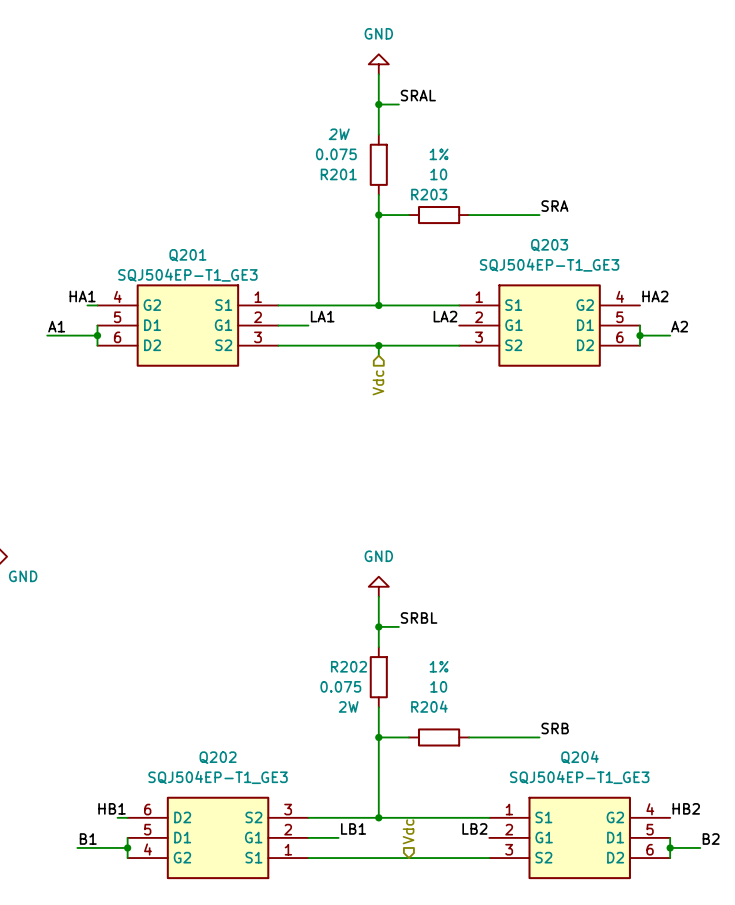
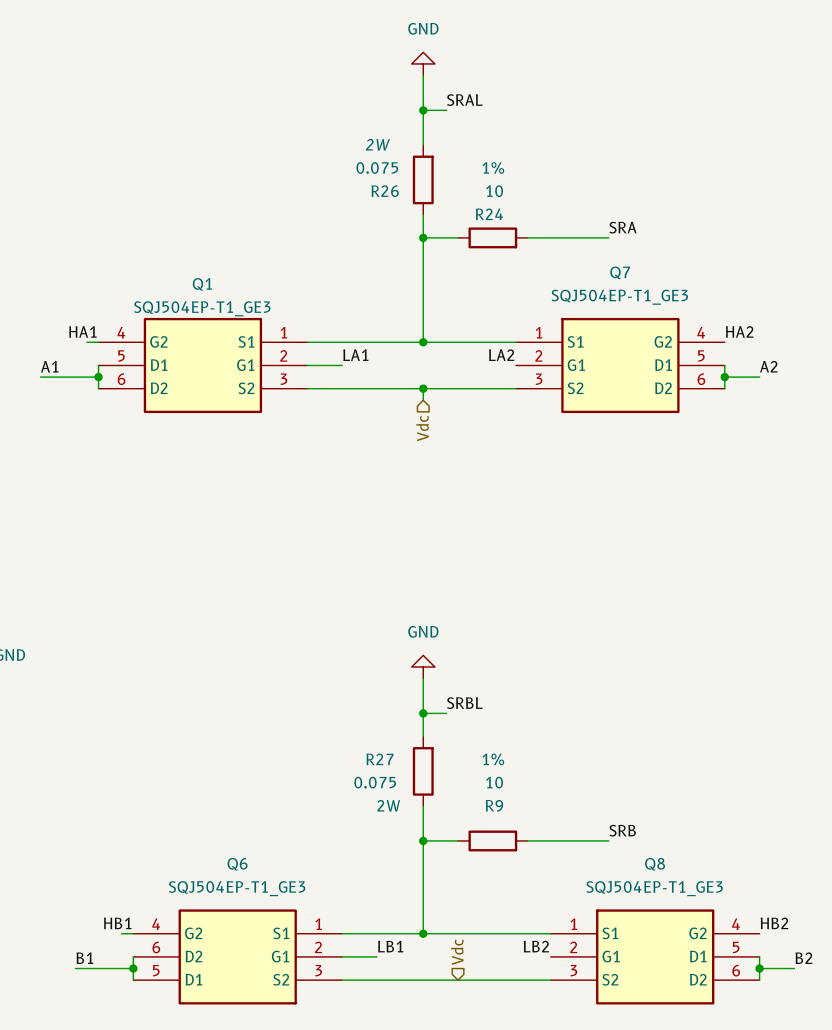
R201 name: R201 (338, 174) -> R26 (385, 191)
R203 name: R203 (429, 194) -> R24 (489, 214)
Q203 name: Q203 (549, 245) -> Q7 (620, 272)
Q201 name: Q201 (187, 255) -> Q1 (202, 284)
R202 name: R202 (348, 666) -> R27 (379, 759)
R204 name: R204 (429, 706) -> R9 (494, 805)
Q202 name: Q202 (218, 757) -> Q6 (237, 864)
Q204 name: Q204 (579, 757) -> Q8 (655, 864)
Q202 symbol: [127, 796, 309, 880] -> [133, 909, 343, 1005]

